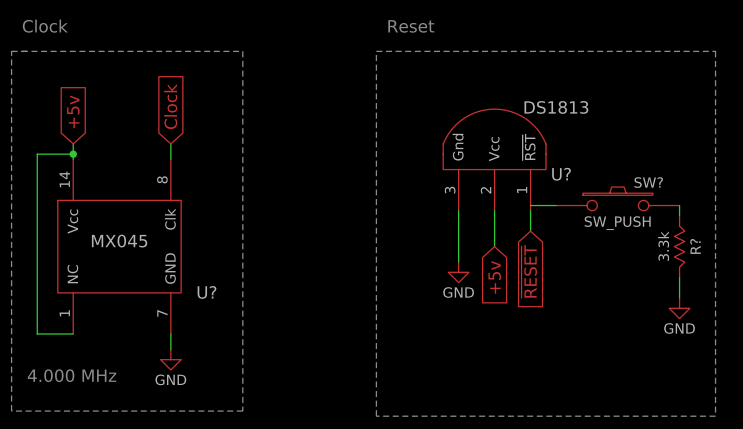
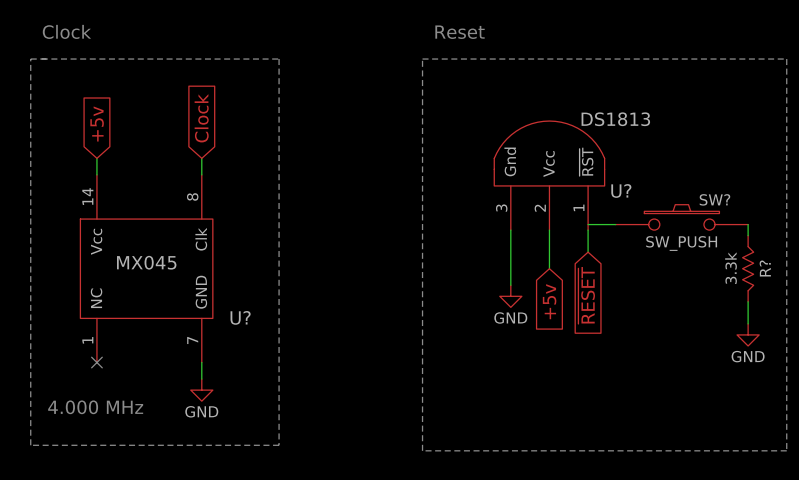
wire: (73, 154) (37, 154) (37, 333) (73, 333) -> none
junction: (73, 154) -> none
no-connect mark: none -> (96, 362)

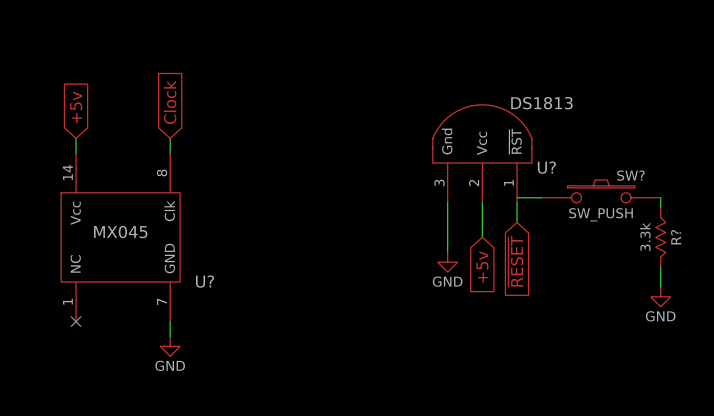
text: Clock (66, 31) -> none
text: Reset (460, 32) -> none
line: (30, 59) (279, 59) (279, 445) (30, 445) (30, 59) -> none
line: (422, 59) (786, 59) (786, 450) (422, 450) (422, 59) -> none
text: 4.000 MHz (95, 407) -> none

